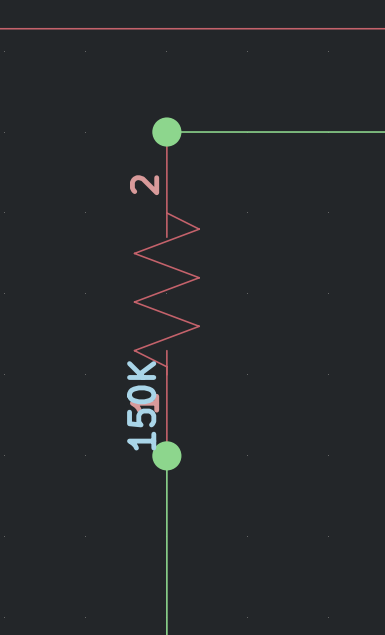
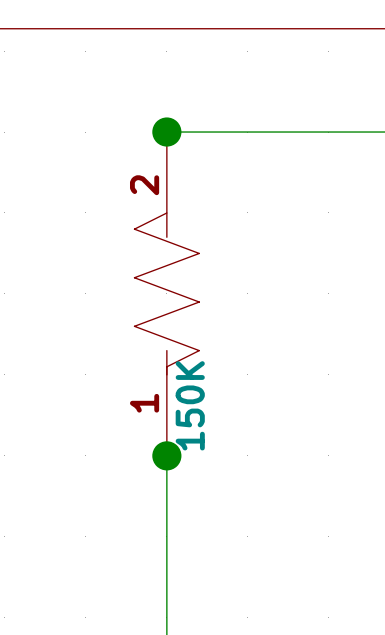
part flip: as is (166, 293) -> left-right (166, 293)

